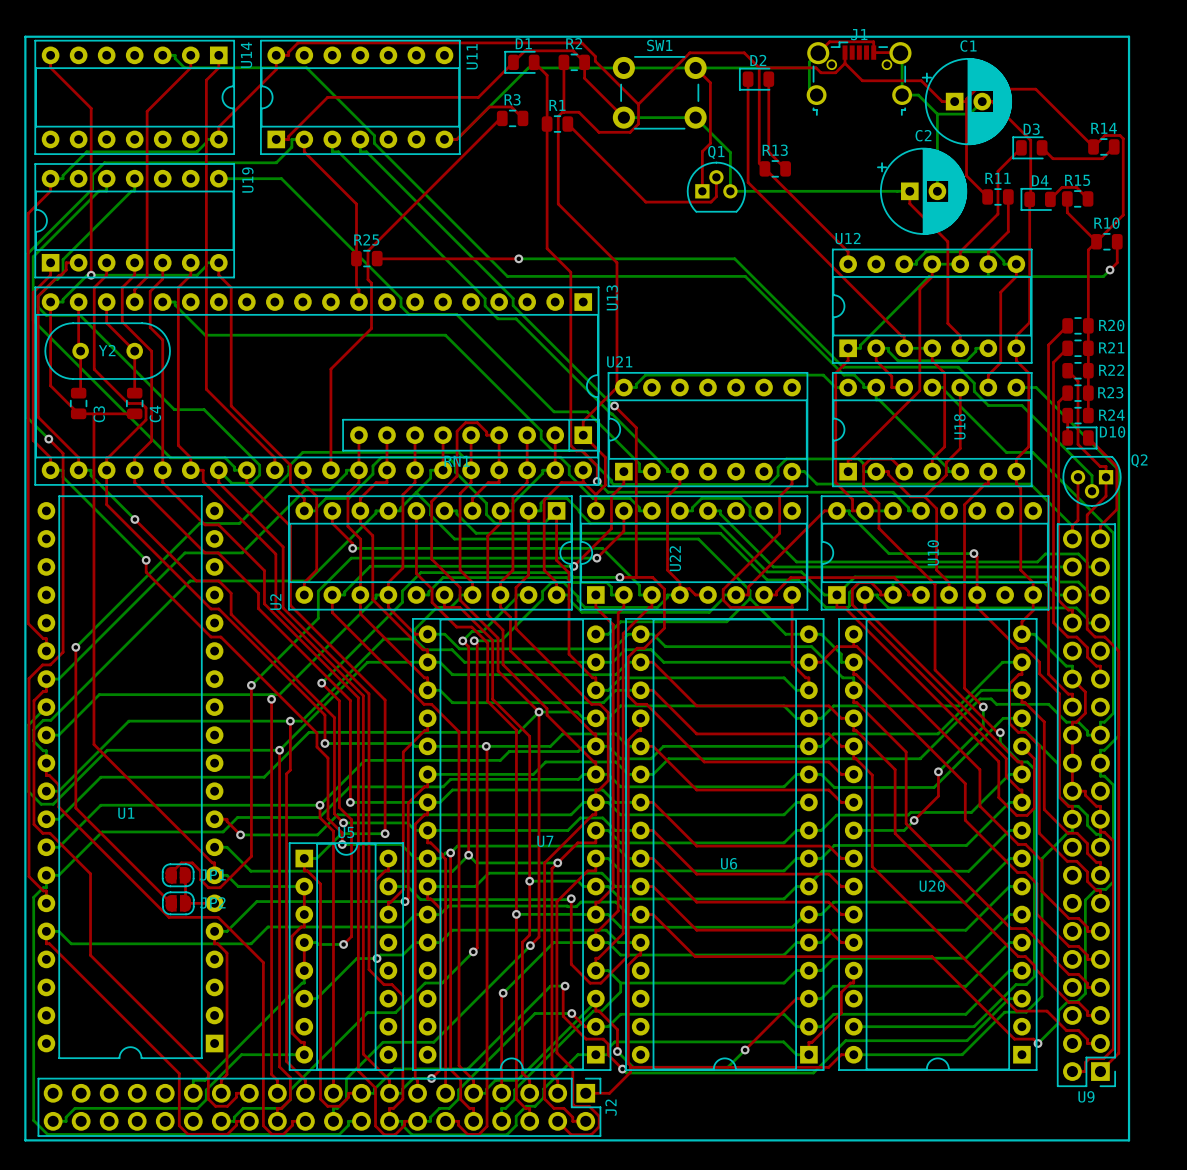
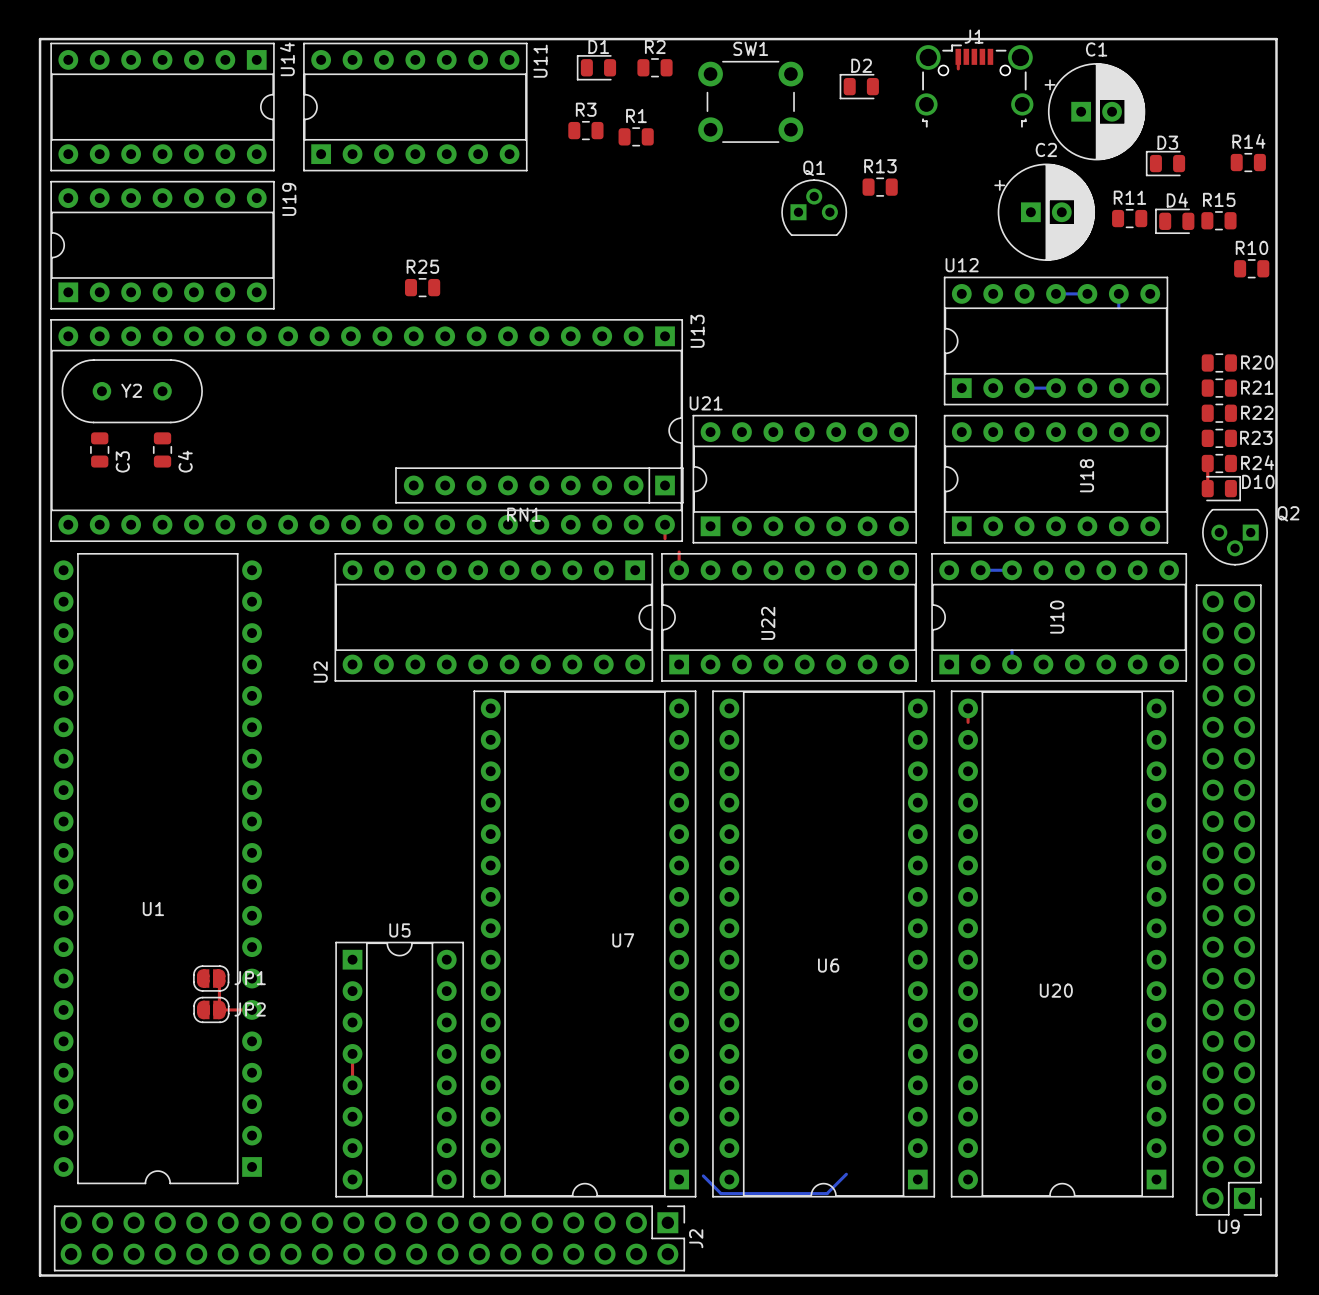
top track: (818, 53) (829, 41) (873, 41) (873, 52) (900, 53) -> none
bottom track: (818, 53) (809, 62) (809, 87) (816, 95) -> none
bottom track: (900, 53) (902, 54) (902, 95) (918, 95) (937, 114) -> none
top track: (50, 55) (50, 67) (91, 108) (91, 275) -> none
bottom track: (162, 55) (175, 55) (175, 58) (184, 67) (306, 67) (374, 135) (374, 143) (507, 276) (745, 276) (844, 375) (854, 375) (863, 384) (863, 387) (876, 387) (876, 399) (879, 399) (947, 468) (947, 471) (960, 471) -> none
top track: (190, 55) (190, 67) (147, 111) (147, 277) (134, 289) (134, 302) -> none
top track: (218, 55) (218, 67) (206, 80) (206, 389) (274, 457) (274, 470) -> none
top track: (534, 62) (547, 75) (547, 248) (570, 272) (570, 445) (576, 450) (582, 450) (597, 465) (597, 481) -> none
top track: (563, 62) (563, 112) -> none
top track: (695, 67) (710, 82) (710, 143) (702, 151) (702, 191) -> none
top track: (759, 67) (816, 67) (820, 72) (835, 72) (845, 63) (862, 80) (921, 80) (942, 101) (966, 101) -> none
top track: (759, 67) (744, 52) (689, 52) (638, 104) -> none
top track: (759, 67) (759, 163) (848, 251) (848, 264) -> none
bottom track: (809, 67) (528, 67) (456, 139) (444, 139) -> none
top track: (748, 79) (748, 182) (901, 335) (904, 335) (904, 348) -> none
top track: (768, 79) (768, 152) (785, 168) -> none
top track: (982, 101) (991, 101) (1030, 140) (1029, 322) (1016, 335) (1016, 360) (1028, 373) (1028, 446) (1016, 459) (1016, 484) (1020, 488) (1020, 570) (1033, 582) (1033, 610) (1021, 621) (1021, 634) -> none
bottom track: (982, 101) (969, 114) (937, 114) -> none
bottom track: (937, 114) (937, 191) -> none
top track: (623, 117) (584, 78) (584, 62) (573, 50) (525, 50) (478, 97) (327, 97) (288, 136) (288, 139) (276, 139) -> none
bottom track: (623, 117) (695, 117) (730, 152) (730, 191) (909, 191) -> none
top track: (502, 118) (368, 251) (368, 279) (371, 283) (371, 328) (330, 369) (330, 470) -> none
top track: (522, 118) (511, 106) (489, 106) (456, 139) (444, 139) -> none
top track: (567, 124) (645, 202) (711, 202) (716, 196) (716, 177) -> none
top track: (218, 139) (218, 127) (276, 69) (276, 55) (288, 55) (288, 52) (298, 42) (581, 42) (595, 56) (595, 61) (638, 104) (638, 123) (630, 132) (598, 132) (578, 112) (562, 112) (558, 116) (558, 204) (616, 262) (616, 387) -> none
bottom track: (218, 139) (206, 139) (206, 142) (197, 151) (86, 151) (63, 175) (63, 178) (50, 178) -> none
top track: (304, 139) (304, 151) (356, 204) (356, 287) (358, 289) (358, 302) -> none
bottom track: (304, 139) (291, 139) (291, 147) (276, 162) (104, 162) (92, 174) (92, 188) (27, 253) (27, 418) (48, 439) -> none
bottom track: (332, 139) (332, 151) (338, 151) (485, 298) (485, 306) (497, 318) (516, 318) (667, 469) (667, 471) (679, 471) -> none
bottom track: (360, 139) (360, 151) (366, 151) (513, 298) (513, 305) (614, 405) -> none
top track: (1114, 146) (1102, 158) (1052, 158) (1042, 147) -> none
top track: (1021, 147) (997, 171) (997, 214) (960, 251) (960, 264) -> none
top track: (50, 178) (50, 191) (28, 213) (28, 623) (43, 638) (46, 638) (46, 651) -> none
bottom track: (106, 178) (106, 191) (98, 191) (33, 256) (33, 320) (170, 457) (225, 457) (234, 467) (234, 470) (246, 470) -> none
bottom track: (134, 178) (134, 191) (131, 191) (63, 259) (63, 273) (38, 296) (38, 307) (46, 315) (80, 315) (174, 409) (204, 409) (259, 465) (259, 475) (251, 483) (231, 483) (218, 470) -> none
bottom track: (218, 178) (281, 178) (401, 298) (401, 306) (409, 314) (456, 314) (554, 411) (587, 411) (639, 463) (639, 471) (651, 471) -> none
top track: (909, 191) (909, 203) (947, 241) (947, 323) (960, 335) (960, 348) -> none
top track: (987, 196) (966, 175) (966, 99) (976, 89) (1035, 89) (1093, 146) (1104, 135) (1120, 135) (1123, 138) (1123, 215) (1088, 249) (1088, 415) -> none
top track: (1008, 196) (1008, 231) (988, 251) (988, 264) -> none
top track: (1067, 198) (1067, 212) (1096, 241) -> none
top track: (1088, 198) (1076, 187) (1062, 187) (1050, 199) -> none
top track: (1117, 241) (1117, 262) (1110, 270) -> none
top track: (377, 258) (518, 258) -> none
bottom track: (518, 258) (734, 258) (843, 367) (958, 367) (974, 383) (974, 391) (988, 405) (1021, 405) (1092, 475) (1092, 491) -> none
via: (518, 258) -> none
top track: (50, 262) (50, 275) (33, 292) (33, 440) (50, 457) (50, 470) -> none
top track: (78, 262) (66, 262) (66, 269) (38, 296) (38, 417) (78, 457) (78, 470) -> none
top track: (106, 262) (106, 275) (94, 287) (94, 369) (128, 403) (141, 403) (146, 407) (146, 419) (106, 457) (106, 504) (211, 609) (218, 609) (324, 715) (324, 743) -> none
top track: (134, 262) (134, 275) (122, 287) (122, 321) (151, 351) (151, 440) (134, 457) (134, 482) (204, 552) (218, 552) (258, 593) (258, 608) (350, 700) (350, 802) -> none
top track: (162, 262) (162, 278) (150, 291) (150, 327) (162, 339) (162, 482) (204, 524) (218, 524) (264, 570) (264, 603) (358, 697) (358, 1070) (375, 1088) (375, 1126) (384, 1134) (395, 1134) (404, 1125) (404, 1121) (417, 1121) -> none
top track: (190, 262) (190, 275) (178, 287) (178, 445) (190, 457) (190, 470) (203, 470) (203, 481) (275, 554) (275, 608) (363, 695) (363, 1054) (389, 1080) (389, 1093) -> none
top track: (218, 262) (218, 275) (231, 287) (231, 405) (290, 465) (290, 484) (304, 498) (304, 510) -> none
bottom track: (218, 262) (206, 262) (206, 265) (197, 275) (87, 275) (63, 299) (63, 302) (50, 302) -> none
bottom track: (904, 264) (916, 264) (916, 261) (925, 251) (994, 251) (1003, 261) (1003, 264) (1016, 264) -> none
top track: (932, 264) (932, 276) (919, 289) (919, 390) (851, 459) (848, 459) (848, 471) -> none
top track: (1016, 264) (1016, 276) (1000, 292) (1000, 362) (988, 375) (988, 387) -> none
bottom track: (1110, 270) (1103, 276) (929, 276) (860, 345) (860, 348) (848, 348) -> none
via: (1110, 270) -> none
via: (91, 275) -> none
top track: (50, 302) (50, 385) (78, 413) (134, 413) -> none
top track: (78, 302) (78, 349) (80, 351) (80, 391) (78, 393) -> none
top track: (106, 302) (106, 323) (134, 351) (134, 393) -> none
bottom track: (162, 302) (175, 302) (175, 305) (205, 335) (445, 335) (541, 430) (541, 439) (552, 450) (581, 450) (613, 484) (769, 484) (778, 475) (778, 467) (786, 458) (858, 458) (863, 463) (863, 471) (876, 471) -> none
top track: (1067, 325) (1048, 345) (1048, 674) (1068, 694) (1072, 694) (1072, 707) -> none
top track: (848, 348) (848, 360) (835, 373) (835, 482) (852, 499) (852, 510) (864, 510) -> none
top track: (876, 348) (876, 360) (891, 376) (891, 387) (904, 387) -> none
bottom track: (876, 348) (888, 348) (888, 351) (897, 360) (966, 360) (975, 351) (975, 348) (988, 348) -> none
top track: (932, 348) (932, 360) (944, 373) (944, 446) (932, 459) (932, 471) -> none
top track: (1067, 348) (1053, 362) (1053, 622) (1067, 637) (1076, 637) (1087, 647) (1087, 657) (1096, 666) (1100, 666) (1100, 679) -> none
top track: (1067, 370) (1078, 381) (1078, 444) (1100, 466) (1106, 466) (1106, 496) (1087, 514) (1087, 629) (1095, 637) (1104, 637) (1118, 650) (1118, 1053) (1100, 1071) -> none
top track: (616, 387) (583, 421) (583, 435) (605, 457) (605, 485) (595, 494) (583, 482) (561, 482) (544, 499) (544, 570) (556, 582) (556, 594) -> none
bottom track: (623, 387) (636, 387) (636, 384) (645, 375) (823, 375) (835, 387) (848, 387) -> none
bottom track: (932, 387) (944, 387) (944, 390) (1006, 452) (1032, 452) (1113, 533) (1113, 713) (1104, 722) (1100, 722) (1100, 735) (1087, 735) (1087, 731) (1078, 722) (1066, 722) (1048, 704) (996, 704) (991, 698) (980, 698) (920, 758) (668, 758) (653, 774) (628, 774) (615, 761) (545, 761) (533, 774) (427, 774) -> none
top track: (960, 387) (960, 448) (946, 462) (946, 475) (924, 496) -> none
bottom track: (1016, 387) (1036, 387) (1118, 470) (1118, 735) (1104, 750) (1100, 750) (1100, 776) (1104, 776) (1113, 785) (1113, 881) (1105, 889) (1096, 889) (1085, 900) (1085, 993) (1077, 1001) (1067, 1001) (1058, 1010) (1058, 1022) (1038, 1043) -> none
top track: (1067, 393) (1058, 402) (1058, 600) (1068, 610) (1072, 610) (1072, 623) -> none
top track: (614, 405) (636, 427) (636, 577) -> none
via: (614, 405) -> none
top track: (93, 413) (93, 744) (212, 862) (214, 862) (214, 875) -> none
top track: (358, 435) (358, 482) (347, 493) (347, 526) (360, 539) (360, 613) (424, 677) (427, 677) (427, 690) -> none
top track: (387, 435) (387, 482) (376, 482) (360, 498) (360, 523) (372, 535) (372, 599) (422, 649) (427, 649) (427, 662) -> none
top track: (415, 435) (415, 482) (402, 494) (402, 568) (388, 582) (388, 607) (415, 634) (427, 634) -> none
top track: (443, 435) (443, 470) -> none
top track: (471, 435) (471, 482) (460, 493) (460, 570) (472, 582) (472, 594) -> none
top track: (527, 435) (527, 482) (512, 496) (512, 570) (500, 582) (500, 607) (510, 617) (510, 650) (593, 733) (595, 733) (595, 746) -> none
top track: (555, 435) (555, 470) -> none
top track: (1088, 437) (1116, 466) (1116, 509) (1100, 525) (1100, 538) -> none
top track: (48, 439) (63, 453) (63, 652) (50, 664) (42, 664) (29, 678) (29, 876) (43, 890) (46, 890) (46, 903) -> none
via: (48, 439) -> none
bottom track: (50, 470) (63, 470) (63, 477) (146, 560) -> none
bottom track: (78, 470) (91, 470) (91, 475) (134, 519) -> none
top track: (218, 470) (218, 482) (283, 546) (283, 608) (369, 693) (369, 969) (384, 984) (392, 984) (402, 995) (402, 1099) (393, 1108) (389, 1108) (389, 1121) -> none
top track: (246, 470) (246, 482) (290, 526) (290, 605) (385, 700) (385, 833) -> none
top track: (302, 470) (302, 482) (316, 496) (316, 570) (304, 582) (304, 594) -> none
bottom track: (358, 470) (346, 470) (346, 473) (329, 489) (305, 489) (242, 552) (184, 552) (58, 679) (46, 679) -> none
bottom track: (443, 470) (430, 470) (430, 478) (400, 507) (400, 510) (375, 510) (375, 513) (308, 580) (190, 580) (50, 720) (43, 720) (33, 729) (33, 741) (43, 750) (46, 750) (46, 763) -> none
bottom track: (555, 470) (542, 470) (542, 473) (512, 503) (512, 510) (500, 510) -> none
top track: (623, 471) (623, 484) (611, 496) (611, 528) (573, 566) -> none
top track: (679, 471) (679, 484) (667, 496) (667, 570) (679, 582) (679, 594) -> none
top track: (792, 471) (792, 484) (779, 496) (779, 533) (723, 589) (723, 600) (730, 607) (792, 607) -> none
bottom track: (792, 471) (804, 471) (816, 484) (1030, 484) (1072, 525) (1072, 538) -> none
top track: (876, 471) (888, 471) (888, 474) (910, 496) (924, 496) -> none
top track: (904, 471) (891, 459) (870, 459) (863, 465) (863, 488) (878, 503) (878, 528) (935, 584) (935, 670) (997, 732) (1000, 732) -> none
top track: (988, 471) (988, 484) (985, 484) (964, 504) (964, 688) (983, 706) -> none
top track: (1078, 477) (1078, 520) (1072, 525) (1072, 538) -> none
bottom track: (597, 481) (608, 492) (893, 492) (908, 507) (908, 510) (921, 510) -> none
via: (597, 481) -> none
bottom track: (416, 492) (430, 506) (430, 514) (454, 539) (698, 539) (750, 590) (750, 598) -> none
top track: (924, 496) (936, 508) (936, 570) (949, 582) (949, 594) -> none
bottom track: (304, 510) (316, 510) (316, 507) (326, 498) (348, 498) (372, 474) (372, 465) (381, 457) (448, 457) (455, 464) (455, 472) (486, 503) (486, 514) (495, 523) (544, 523) (556, 510) -> none
top track: (332, 510) (332, 523) (352, 543) (352, 548) -> none
top track: (416, 510) (416, 573) (432, 589) (432, 602) (456, 627) (471, 627) (487, 642) (487, 701) (516, 730) (516, 1099) (525, 1108) (529, 1108) (529, 1121) -> none
bottom track: (444, 510) (456, 510) (456, 513) (476, 533) (720, 533) (767, 579) (798, 579) (825, 607) (847, 607) (849, 592) (859, 582) (1044, 582) (1056, 594) (1072, 594) -> none
top track: (472, 510) (472, 498) (488, 482) (499, 482) (499, 435) (486, 435) (486, 432) (477, 422) (465, 422) (457, 431) (457, 476) (431, 501) (431, 559) (460, 587) (460, 600) (498, 638) (498, 671) (539, 712) (539, 937) (530, 945) -> none
top track: (500, 510) (500, 523) (487, 536) (487, 614) (503, 630) (503, 664) (547, 708) (547, 715) (595, 761) (595, 774) -> none
top track: (528, 510) (528, 575) (515, 587) (515, 628) (591, 704) (599, 704) (608, 712) (608, 780) (598, 790) (595, 790) (595, 814) (592, 814) (544, 863) (544, 1098) (554, 1108) (563, 1108) (572, 1117) (572, 1121) (585, 1121) -> none
bottom track: (528, 510) (540, 510) (540, 503) (545, 498) (566, 498) (590, 523) (718, 523) (766, 571) (801, 571) (824, 594) (836, 594) (854, 576) (1054, 576) (1059, 582) (1078, 582) (1087, 590) (1087, 594) (1100, 594) -> none
top track: (556, 510) (556, 560) (569, 572) (569, 654) (592, 677) (595, 677) (595, 690) -> none
top track: (623, 510) (623, 531) (596, 558) -> none
bottom track: (651, 510) (639, 510) (639, 507) (630, 498) (593, 498) (569, 474) (569, 466) (560, 457) (463, 457) (458, 452) (302, 452) (288, 466) (288, 474) (239, 523) (199, 523) (75, 647) -> none
bottom track: (679, 510) (692, 510) (692, 507) (701, 498) (741, 498) (750, 507) (750, 515) (796, 561) (1037, 561) (1045, 553) (1078, 553) (1087, 562) (1087, 566) (1100, 566) -> none
bottom track: (707, 510) (720, 510) (720, 513) (773, 566) (1072, 566) -> none
top track: (836, 510) (824, 510) (748, 586) (748, 594) (736, 594) -> none
bottom track: (836, 510) (849, 510) (849, 513) (888, 553) (973, 553) -> none
top track: (134, 519) (196, 580) (218, 580) (231, 593) (231, 614) (334, 717) (334, 813) (343, 822) -> none
via: (134, 519) -> none
bottom track: (352, 548) (602, 548) (639, 585) (639, 594) (651, 594) -> none
via: (352, 548) -> none
top track: (973, 553) (977, 556) (977, 607) (1017, 648) (1025, 648) (1039, 662) (1039, 673) (1059, 693) (1059, 797) (1068, 806) (1072, 806) (1072, 819) -> none
via: (973, 553) -> none
bottom track: (596, 558) (351, 558) (318, 591) (318, 618) (251, 685) -> none
via: (596, 558) -> none
top track: (146, 560) (146, 572) (211, 637) (220, 637) (316, 733) (316, 747) (328, 758) (328, 818) (342, 832) (342, 844) -> none
via: (146, 560) -> none
bottom track: (573, 566) (370, 566) (344, 591) (344, 594) (332, 594) -> none
via: (573, 566) -> none
top track: (619, 577) (652, 577) (664, 589) (664, 628) (644, 648) (637, 648) (628, 657) (628, 695) (636, 704) (646, 704) (704, 761) (828, 761) (841, 774) (853, 774) -> none
bottom track: (619, 577) (573, 577) (568, 572) (420, 572) (402, 591) (402, 602) (321, 683) -> none
via: (619, 577) -> none
top track: (679, 588) (689, 588) (695, 594) (707, 594) -> none
top track: (332, 594) (332, 612) (424, 704) (431, 704) (459, 731) (459, 1065) (473, 1080) (473, 1093) -> none
bottom track: (388, 594) (375, 594) (375, 598) (279, 694) (99, 694) (58, 735) (46, 735) -> none
bottom track: (416, 594) (428, 594) (428, 591) (443, 577) (566, 577) (571, 582) (606, 582) (611, 587) (611, 594) (623, 594) -> none
top track: (444, 594) (444, 607) (459, 607) (492, 640) (492, 699) (529, 736) (529, 935) (522, 942) (522, 1073) (529, 1080) (529, 1093) -> none
bottom track: (472, 594) (460, 594) (460, 598) (450, 607) (436, 607) (414, 629) (414, 639) -> none
bottom track: (528, 594) (516, 594) (516, 598) (482, 631) (472, 631) (462, 640) -> none
bottom track: (556, 594) (569, 594) (569, 599) (582, 612) (709, 612) (723, 598) (723, 594) (736, 594) -> none
top track: (595, 594) (595, 607) (613, 624) (613, 887) (598, 902) (595, 902) (595, 914) -> none
top track: (623, 594) (623, 607) (618, 613) (618, 910) (598, 930) (595, 930) (595, 942) -> none
top track: (651, 594) (651, 607) (649, 607) (623, 633) (623, 933) (598, 958) (595, 958) (595, 970) -> none
bottom track: (679, 594) (667, 594) (667, 597) (657, 607) (584, 607) (578, 600) (578, 596) (563, 582) (551, 582) (542, 591) (542, 599) (501, 640) (474, 640) -> none
top track: (764, 594) (776, 594) (776, 591) (790, 577) (894, 577) (908, 591) (908, 594) (921, 594) -> none
top track: (792, 594) (792, 664) (805, 677) (808, 677) (808, 690) -> none
top track: (836, 594) (836, 607) (844, 607) (998, 761) (998, 797) (1016, 815) (1027, 815) (1034, 808) (1034, 758) (1021, 746) -> none
top track: (864, 594) (864, 608) (1018, 761) (1021, 761) (1021, 774) -> none
bottom track: (864, 594) (877, 594) (888, 607) (1076, 607) (1087, 618) (1087, 623) (1100, 623) -> none
top track: (892, 594) (880, 594) (880, 591) (871, 582) (859, 582) (852, 589) (852, 604) (1006, 758) (1006, 776) (1019, 790) (1021, 790) (1021, 802) -> none
bottom track: (750, 598) (785, 634) (821, 634) (841, 654) (841, 662) (853, 662) -> none
bottom track: (750, 598) (726, 621) (620, 621) (608, 634) (595, 634) -> none
bottom track: (427, 634) (444, 634) (459, 648) (613, 648) (628, 634) (653, 634) (665, 646) (811, 646) (842, 677) (853, 677) (853, 690) -> none
bottom track: (1021, 634) (1034, 634) (1066, 666) (1072, 666) (1072, 679) -> none
bottom track: (414, 639) (425, 649) (452, 649) (464, 662) (612, 662) (625, 649) (651, 649) (663, 662) (808, 662) -> none
bottom track: (414, 639) (383, 639) (301, 721) (128, 721) (58, 791) (46, 791) -> none
top track: (462, 640) (468, 646) (468, 855) -> none
via: (462, 640) -> none
top track: (474, 640) (477, 643) (477, 947) (473, 951) -> none
via: (474, 640) -> none
top track: (75, 647) (75, 808) (171, 903) -> none
via: (75, 647) -> none
top track: (640, 662) (653, 662) (696, 705) (828, 705) (841, 718) (853, 718) (853, 730) (856, 730) (895, 769) (895, 833) (1018, 956) (1025, 956) (1069, 1002) (1078, 1002) (1087, 1011) (1087, 1015) (1100, 1015) -> none
bottom track: (640, 662) (628, 662) (615, 674) (452, 674) (440, 662) (367, 662) (279, 750) (107, 750) (53, 804) (41, 804) (28, 791) (28, 724) (46, 707) -> none
top track: (808, 662) (821, 662) (836, 646) (856, 646) (979, 769) (979, 806) (1018, 844) (1025, 844) (1041, 860) (1041, 891) (1068, 918) (1078, 918) (1087, 927) (1087, 931) (1100, 931) -> none
top track: (853, 662) (853, 674) (856, 674) (965, 783) (965, 820) (1017, 872) (1025, 872) (1036, 883) (1036, 914) (1069, 946) (1078, 946) (1087, 955) (1087, 959) (1100, 959) -> none
top track: (1021, 662) (1021, 674) (1018, 674) (1009, 683) (1009, 723) (1018, 732) (1025, 732) (1039, 746) (1039, 833) (1067, 861) (1076, 861) (1087, 872) (1087, 881) (1096, 890) (1100, 890) (1100, 903) -> none
bottom track: (1021, 662) (1002, 662) (959, 705) (833, 705) (821, 718) (796, 718) (784, 705) (620, 705) (608, 718) (583, 718) (577, 712) (539, 712) (518, 732) (309, 732) (264, 777) (100, 777) (58, 819) (46, 819) -> none
top track: (46, 679) (46, 691) (43, 691) (33, 700) (33, 824) (42, 833) (49, 833) (90, 873) (90, 955) (208, 1073) (208, 1099) (215, 1106) (227, 1106) (236, 1097) (236, 1093) (249, 1093) -> none
top track: (1072, 679) (1085, 692) (1085, 713) (1076, 722) (1072, 722) (1072, 791) (1085, 791) (1085, 795) (1096, 806) (1100, 806) (1100, 832) (1104, 832) (1113, 841) (1113, 1048) (1103, 1058) (1089, 1058) (1085, 1062) (1085, 1071) (1072, 1071) -> none
top track: (321, 683) (339, 700) (339, 807) (351, 819) (351, 936) (343, 944) -> none
via: (321, 683) -> none
top track: (251, 685) (251, 856) (220, 887) (208, 887) (200, 879) (200, 871) (192, 862) (181, 862) (170, 875) -> none
via: (251, 685) -> none
bottom track: (427, 690) (440, 690) (452, 702) (603, 702) (615, 690) (640, 690) -> none
bottom track: (595, 690) (608, 690) (620, 677) (784, 677) (796, 690) (808, 690) -> none
top track: (640, 690) (653, 690) (696, 733) (828, 733) (841, 746) (853, 746) (853, 758) (872, 775) (872, 866) (1016, 1011) (1047, 1011) (1066, 1030) (1078, 1030) (1087, 1039) (1087, 1043) (1100, 1043) -> none
top track: (853, 690) (853, 702) (856, 702) (906, 752) (906, 823) (1010, 928) (1026, 928) (1068, 974) (1078, 974) (1087, 983) (1087, 987) (1100, 987) -> none
top track: (1021, 690) (1021, 702) (1025, 702) (1044, 721) (1044, 809) (1068, 833) (1077, 833) (1087, 843) (1087, 853) (1096, 862) (1100, 862) (1100, 875) -> none
bottom track: (1021, 690) (981, 690) (938, 733) (833, 733) (821, 746) (663, 746) (651, 758) (620, 758) (608, 746) (583, 746) (578, 751) (509, 751) (500, 760) (364, 760) (320, 805) (100, 805) (58, 847) (46, 847) -> none
top track: (271, 699) (271, 1074) (277, 1080) (277, 1093) -> none
via: (271, 699) -> none
bottom track: (983, 706) (983, 726) (938, 771) -> none
via: (983, 706) -> none
via: (539, 712) -> none
top track: (427, 718) (427, 730) (424, 730) (403, 751) (403, 889) (390, 902) (388, 902) (388, 914) -> none
top track: (640, 718) (640, 730) (637, 730) (628, 740) (628, 955) (600, 983) (590, 983) (571, 964) (571, 898) -> none
top track: (290, 721) (290, 770) (286, 773) (286, 1061) (305, 1080) (305, 1093) -> none
via: (290, 721) -> none
bottom track: (1000, 732) (1000, 742) (1019, 761) (1027, 761) (1034, 768) (1034, 976) (1026, 984) (1016, 984) (974, 1026) (853, 1026) -> none
via: (1000, 732) -> none
bottom track: (324, 743) (412, 743) (415, 746) (550, 746) (562, 733) (615, 733) (628, 746) (640, 746) -> none
via: (324, 743) -> none
top track: (486, 746) (487, 1126) (479, 1134) (467, 1134) (458, 1125) (458, 1121) (445, 1121) -> none
via: (486, 746) -> none
top track: (640, 746) (653, 746) (696, 790) (828, 790) (841, 802) (853, 802) -> none
top track: (279, 750) (279, 1066) (290, 1077) (290, 1099) (281, 1108) (277, 1108) (277, 1121) -> none
via: (279, 750) -> none
top track: (46, 763) (46, 775) (49, 775) (58, 784) (58, 807) (169, 917) (218, 917) (263, 962) (263, 1125) (271, 1134) (283, 1134) (292, 1125) (292, 1121) (305, 1121) -> none
top track: (938, 771) (938, 796) (914, 820) -> none
via: (938, 771) -> none
top track: (427, 774) (427, 786) (424, 786) (408, 803) (408, 898) (405, 901) -> none
bottom track: (1021, 774) (1009, 774) (971, 812) (836, 815) (821, 830) (796, 830) (784, 842) (620, 842) (608, 830) (595, 830) -> none
bottom track: (350, 802) (440, 802) (452, 789) (602, 789) (615, 802) (640, 802) -> none
via: (350, 802) -> none
top track: (427, 802) (427, 814) (424, 814) (415, 824) (415, 1077) (417, 1080) (417, 1093) -> none
top track: (640, 802) (653, 802) (696, 846) (828, 846) (841, 858) (853, 858) -> none
bottom track: (808, 802) (796, 802) (784, 814) (620, 814) (608, 802) (583, 802) (571, 814) (337, 814) (317, 834) (240, 834) -> none
bottom track: (1021, 802) (1009, 802) (966, 845) (834, 845) (821, 858) (796, 858) (784, 870) (620, 870) (608, 858) (595, 858) -> none
top track: (320, 805) (320, 817) (333, 831) (333, 1093) -> none
via: (320, 805) -> none
top track: (214, 819) (227, 819) (240, 834) -> none
bottom track: (1072, 819) (1072, 832) (1068, 832) (1042, 858) (1042, 996) (1026, 1012) (1004, 1012) (962, 1054) (853, 1054) -> none
bottom track: (914, 820) (904, 830) (853, 830) -> none
via: (914, 820) -> none
bottom track: (343, 822) (407, 822) (415, 830) (567, 830) (580, 817) (602, 817) (615, 830) (640, 830) -> none
via: (343, 822) -> none
top track: (427, 830) (427, 842) (430, 842) (445, 859) (445, 1093) -> none
top track: (595, 830) (595, 842) (577, 842) (551, 868) (551, 1074) (557, 1080) (557, 1093) -> none
top track: (640, 830) (653, 830) (696, 874) (828, 874) (841, 886) (853, 886) -> none
bottom track: (1021, 830) (1009, 830) (968, 871) (822, 871) (806, 886) -> none
bottom track: (385, 833) (341, 833) (316, 858) (304, 858) -> none
via: (385, 833) -> none
via: (240, 834) -> none
bottom track: (342, 844) (401, 844) (415, 858) (440, 858) (445, 852) (450, 852) (457, 846) (615, 846) (628, 858) (640, 858) -> none
via: (342, 844) -> none
bottom track: (214, 847) (227, 847) (250, 871) (452, 871) (468, 855) (476, 862) (557, 862) -> none
bottom track: (1100, 847) (1100, 834) (1096, 834) (1087, 825) (1087, 815) (1078, 806) (1069, 806) (1059, 796) (1059, 764) (1025, 730) (1021, 730) (1021, 718) (1003, 718) (934, 787) (834, 787) (821, 774) (796, 774) (784, 786) (620, 786) (608, 774) (583, 774) (578, 779) (450, 779) (443, 786) (349, 786) (319, 817) (237, 817) (223, 831) (102, 831) (58, 875) (46, 875) (46, 887) (43, 887) (33, 897) (33, 1120) (47, 1134) (339, 1134) (348, 1125) (348, 1121) (361, 1121) -> none
top track: (450, 852) (450, 1069) (460, 1079) (460, 1099) (469, 1108) (473, 1108) (473, 1121) -> none
via: (450, 852) -> none
via: (468, 855) -> none
top track: (304, 858) (304, 870) (307, 870) (320, 883) (320, 1099) (327, 1106) (339, 1106) (348, 1097) (348, 1093) (361, 1093) -> none
top track: (388, 858) (388, 870) (385, 870) (375, 880) (377, 958) -> none
top track: (595, 858) (595, 870) (587, 870) (556, 901) (556, 1052) (572, 1068) (572, 1104) (575, 1106) (589, 1106) (599, 1116) (599, 1126) (591, 1134) (571, 1134) (557, 1121) -> none
top track: (640, 858) (653, 858) (696, 902) (828, 902) (841, 914) (853, 914) -> none
bottom track: (1021, 858) (1009, 858) (965, 902) (833, 902) (821, 914) (805, 914) (792, 927) (620, 927) (608, 914) (516, 914) -> none
via: (557, 862) -> none
bottom track: (214, 875) (227, 875) (238, 886) (304, 886) -> none
bottom track: (529, 881) (578, 881) (583, 886) (608, 886) (620, 898) (784, 898) (796, 886) (808, 886) -> none
via: (529, 881) -> none
top track: (304, 886) (304, 926) (301, 926) (291, 936) (291, 1032) (301, 1042) (304, 1042) (304, 1054) -> none
bottom track: (388, 886) (407, 886) (420, 899) (571, 898) -> none
top track: (427, 886) (427, 898) (430, 898) (440, 908) (440, 1069) (431, 1078) -> none
bottom track: (427, 886) (475, 886) (488, 873) (601, 873) (615, 886) (640, 886) -> none
top track: (640, 886) (653, 886) (696, 930) (828, 930) (841, 942) (853, 942) -> none
bottom track: (1021, 886) (1009, 886) (965, 930) (833, 930) (821, 942) (796, 942) (784, 955) (620, 955) (608, 942) (553, 942) (503, 993) -> none
via: (571, 898) -> none
bottom track: (405, 901) (256, 901) (227, 931) (214, 931) -> none
via: (405, 901) -> none
via: (516, 914) -> none
top track: (640, 914) (653, 914) (695, 956) (931, 956) (1014, 1039) (1033, 1039) (1038, 1043) -> none
bottom track: (640, 914) (628, 914) (615, 902) (581, 902) (576, 906) (448, 906) (440, 914) (415, 914) (402, 926) (268, 926) (251, 943) (71, 943) (58, 931) (46, 931) -> none
bottom track: (1021, 914) (1009, 914) (965, 958) (833, 958) (821, 970) (796, 970) (784, 983) (620, 983) -> none
top track: (46, 931) (46, 943) (49, 943) (179, 1073) (179, 1125) (187, 1134) (227, 1134) (236, 1125) (236, 1121) (249, 1121) -> none
top track: (214, 931) (214, 943) (217, 943) (227, 953) (227, 1074) (221, 1080) (221, 1093) -> none
bottom track: (304, 942) (343, 944) -> none
top track: (640, 942) (640, 955) (628, 965) (628, 1063) (630, 1065) (630, 1072) (609, 1093) (585, 1093) -> none
bottom track: (640, 942) (618, 942) (606, 930) (452, 930) (440, 942) (415, 942) (402, 955) (380, 955) (377, 958) (356, 958) (316, 998) (304, 998) -> none
bottom track: (1021, 942) (1009, 942) (965, 986) (833, 986) (821, 998) (808, 998) -> none
via: (343, 944) -> none
bottom track: (530, 945) (433, 1042) (383, 1042) (346, 1078) (346, 1099) (337, 1108) (333, 1108) (333, 1121) -> none
via: (530, 945) -> none
bottom track: (473, 951) (442, 983) (425, 983) (395, 1012) (367, 1012) (290, 1090) (290, 1099) (281, 1108) (243, 1108) (234, 1117) (234, 1121) (221, 1121) -> none
via: (473, 951) -> none
via: (377, 958) -> none
bottom track: (304, 970) (304, 983) (204, 1080) (193, 1080) (193, 1093) -> none
bottom track: (595, 970) (608, 970) (620, 983) -> none
top track: (853, 970) (853, 983) (850, 983) (841, 992) (841, 1012) (812, 1042) (808, 1042) (808, 1054) -> none
bottom track: (1021, 970) (1009, 970) (965, 1014) (833, 1014) (821, 1026) (796, 1026) (784, 1014) (620, 1014) (608, 1026) (595, 1026) -> none
bottom track: (620, 983) (620, 991) (601, 1011) (593, 1011) (514, 1090) (514, 1099) (505, 1108) (501, 1108) (501, 1121) -> none
top track: (565, 986) (563, 988) (563, 1016) (586, 1039) (603, 1039) (608, 1044) (608, 1054) (622, 1069) -> none
bottom track: (565, 986) (550, 986) (467, 1068) (394, 1068) (374, 1089) (374, 1093) (361, 1093) -> none
via: (565, 986) -> none
top track: (503, 993) (501, 1093) -> none
via: (503, 993) -> none
top track: (595, 998) (595, 1011) (598, 1011) (617, 1029) (617, 1051) -> none
bottom track: (595, 998) (595, 1001) (517, 1080) (495, 1080) (486, 1089) (486, 1093) (473, 1093) -> none
top track: (808, 998) (796, 998) (745, 1050) -> none
bottom track: (1021, 998) (1009, 998) (967, 1040) (845, 1040) (813, 1072) (626, 1072) (622, 1069) -> none
top track: (571, 1013) (583, 1026) (595, 1026) -> none
bottom track: (571, 1013) (535, 1013) (458, 1090) (458, 1099) (449, 1108) (439, 1108) (430, 1117) (430, 1121) (417, 1121) -> none
via: (571, 1013) -> none
via: (1038, 1043) -> none
via: (745, 1050) -> none
via: (617, 1051) -> none
bottom track: (304, 1054) (241, 1054) (206, 1089) (206, 1099) (197, 1108) (75, 1108) (66, 1117) (66, 1121) (53, 1121) -> none
bottom track: (808, 1054) (796, 1054) (783, 1041) (614, 1041) (608, 1048) (608, 1054) (577, 1054) (543, 1088) (543, 1097) (535, 1106) (526, 1106) (516, 1116) (516, 1125) (506, 1134) (411, 1134) (402, 1125) (402, 1121) (389, 1121) -> none
top track: (853, 1054) (841, 1054) (828, 1067) (630, 1067) -> none
via: (622, 1069) -> none
bottom track: (431, 1078) (413, 1078) (402, 1089) (402, 1093) (389, 1093) -> none
via: (431, 1078) -> none

